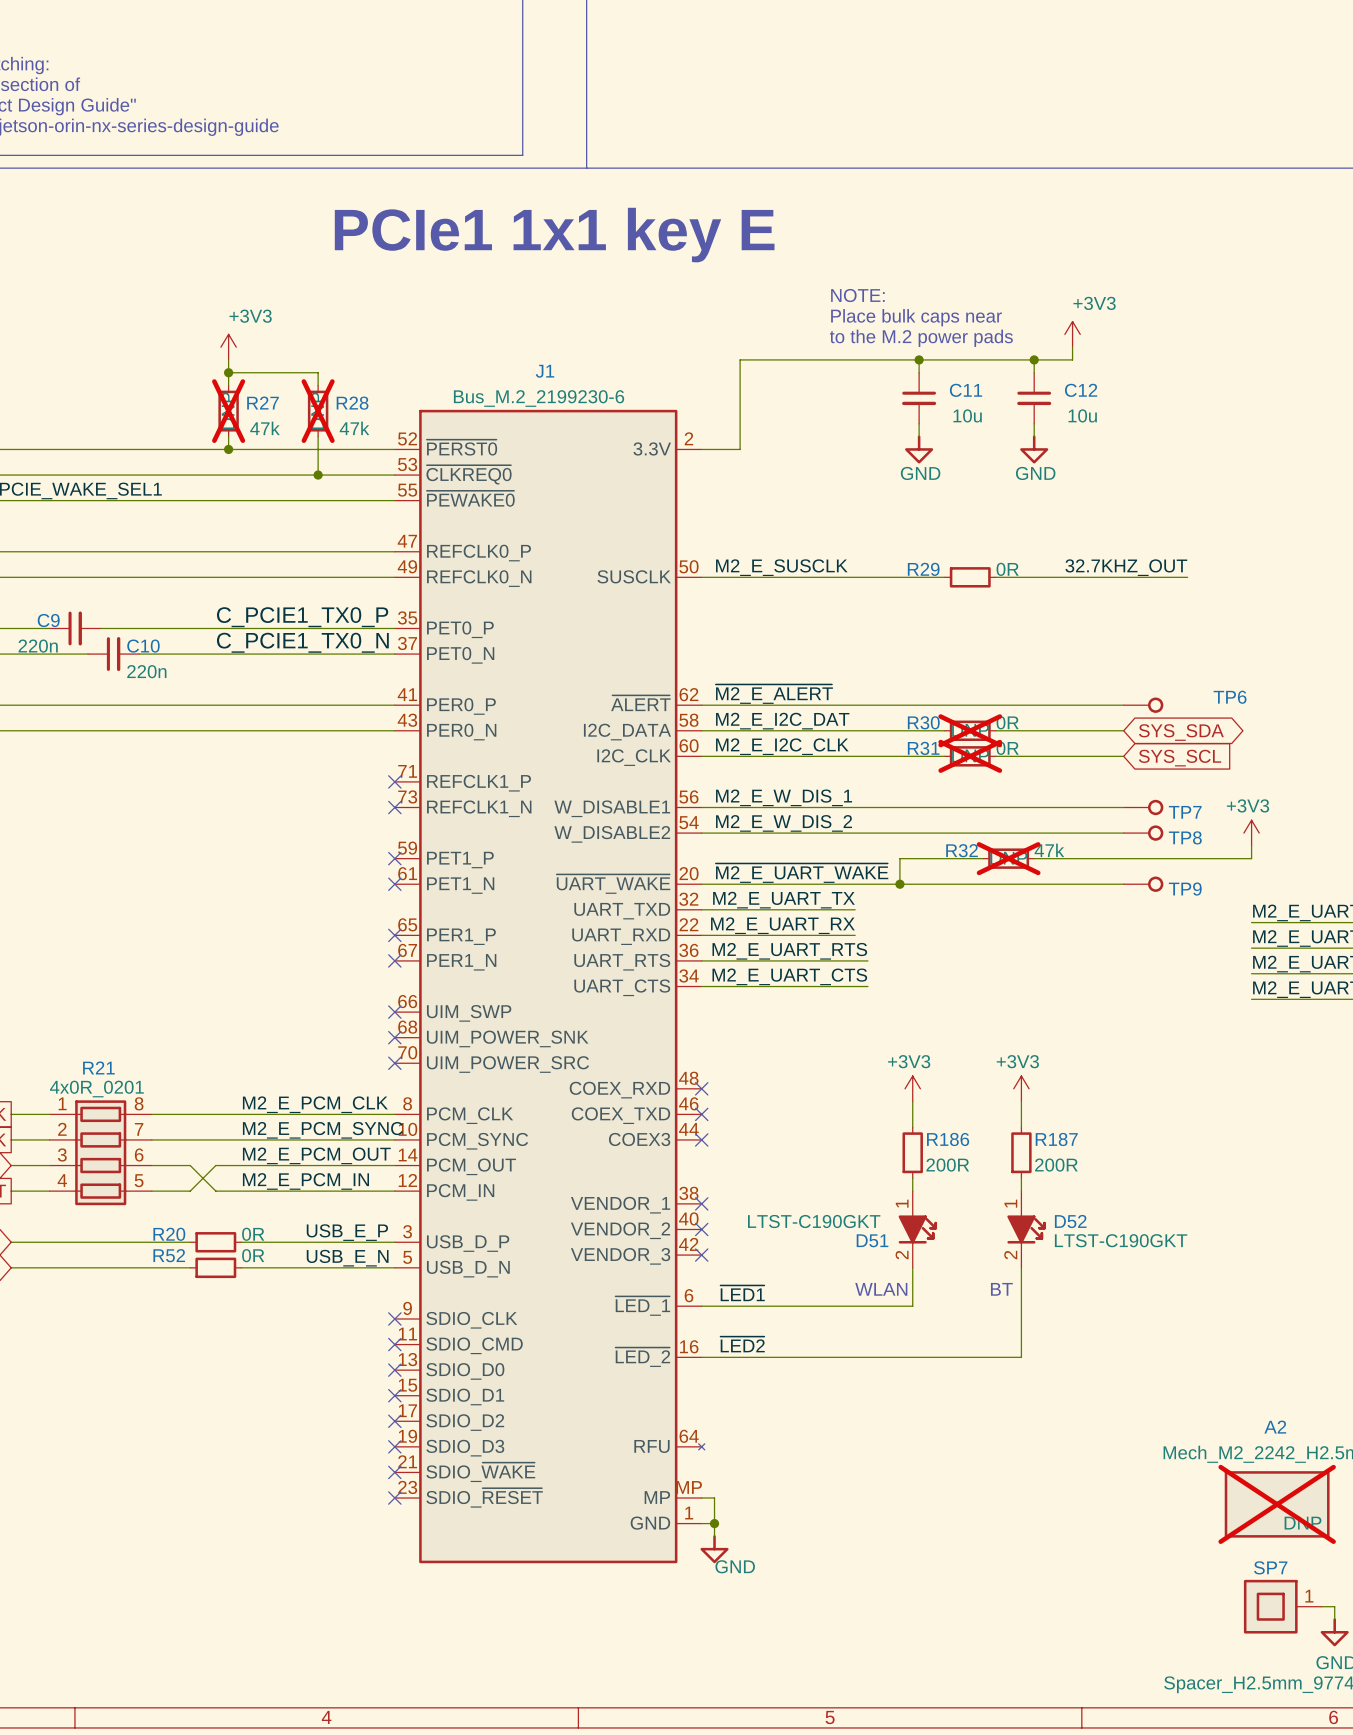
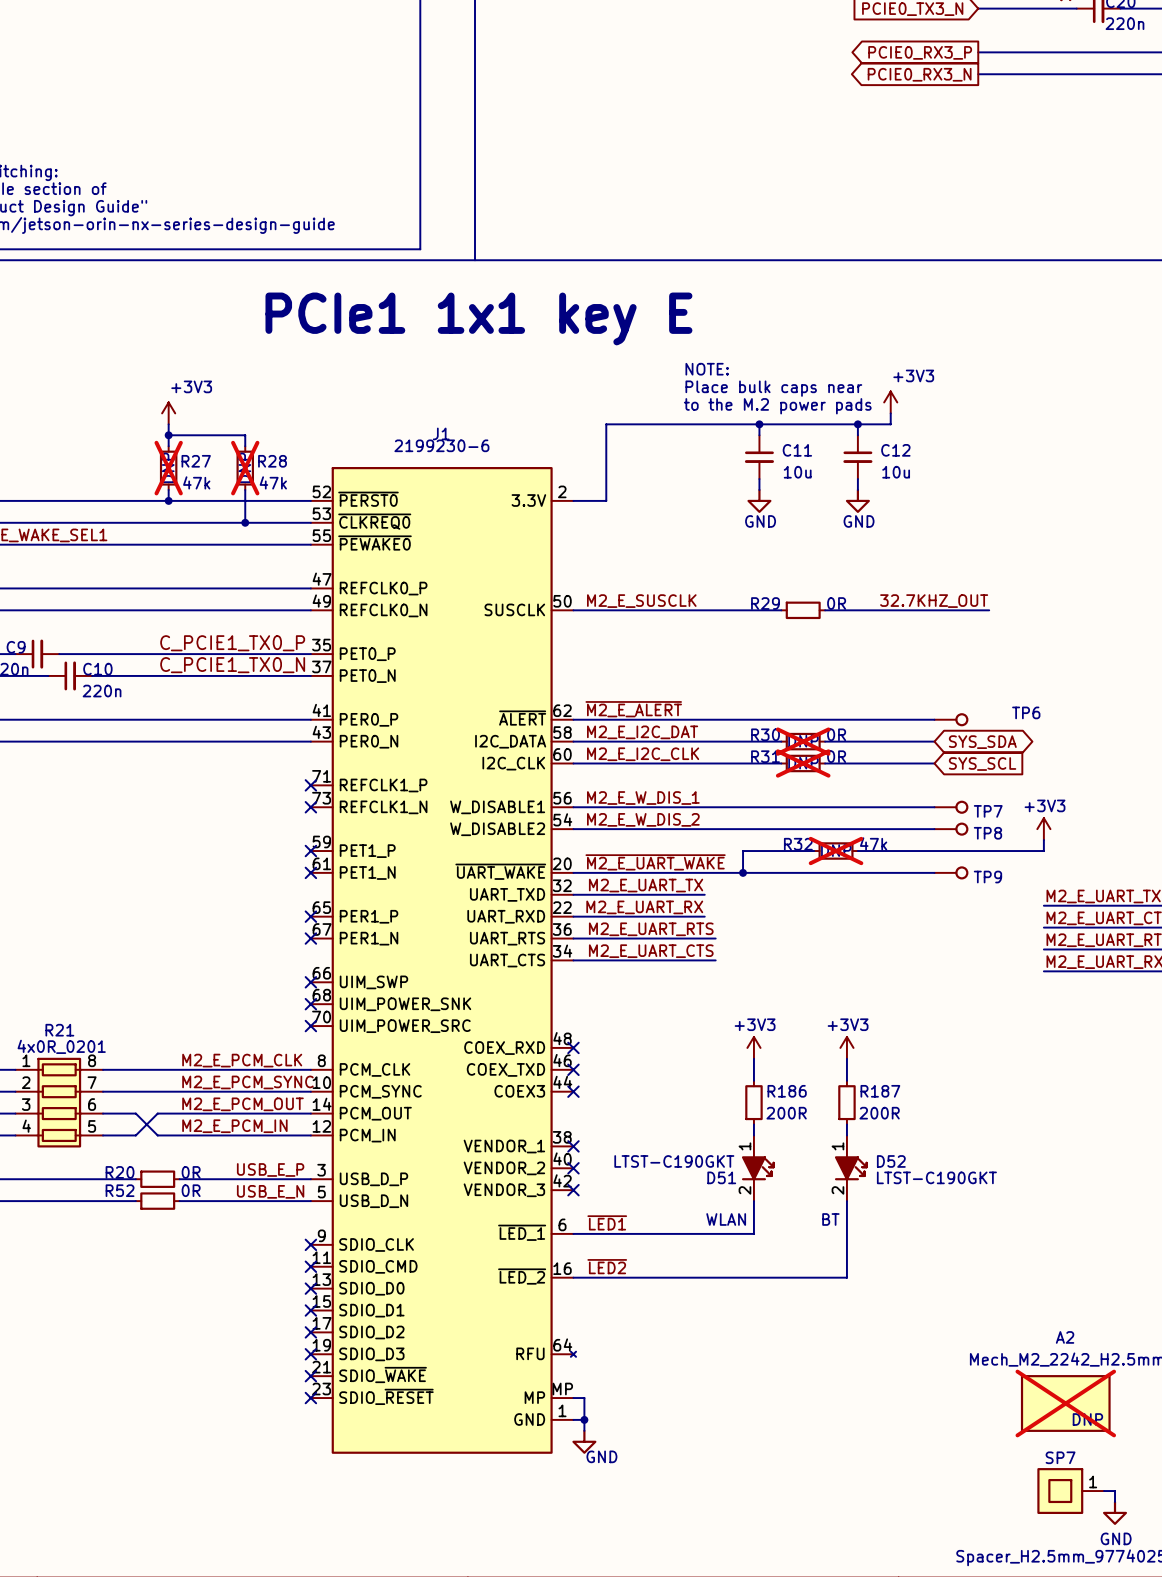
J1 text: none -> 2199230-6 (441, 445)
J1 value: Bus_M.2_2199230-6 (539, 398) -> none

